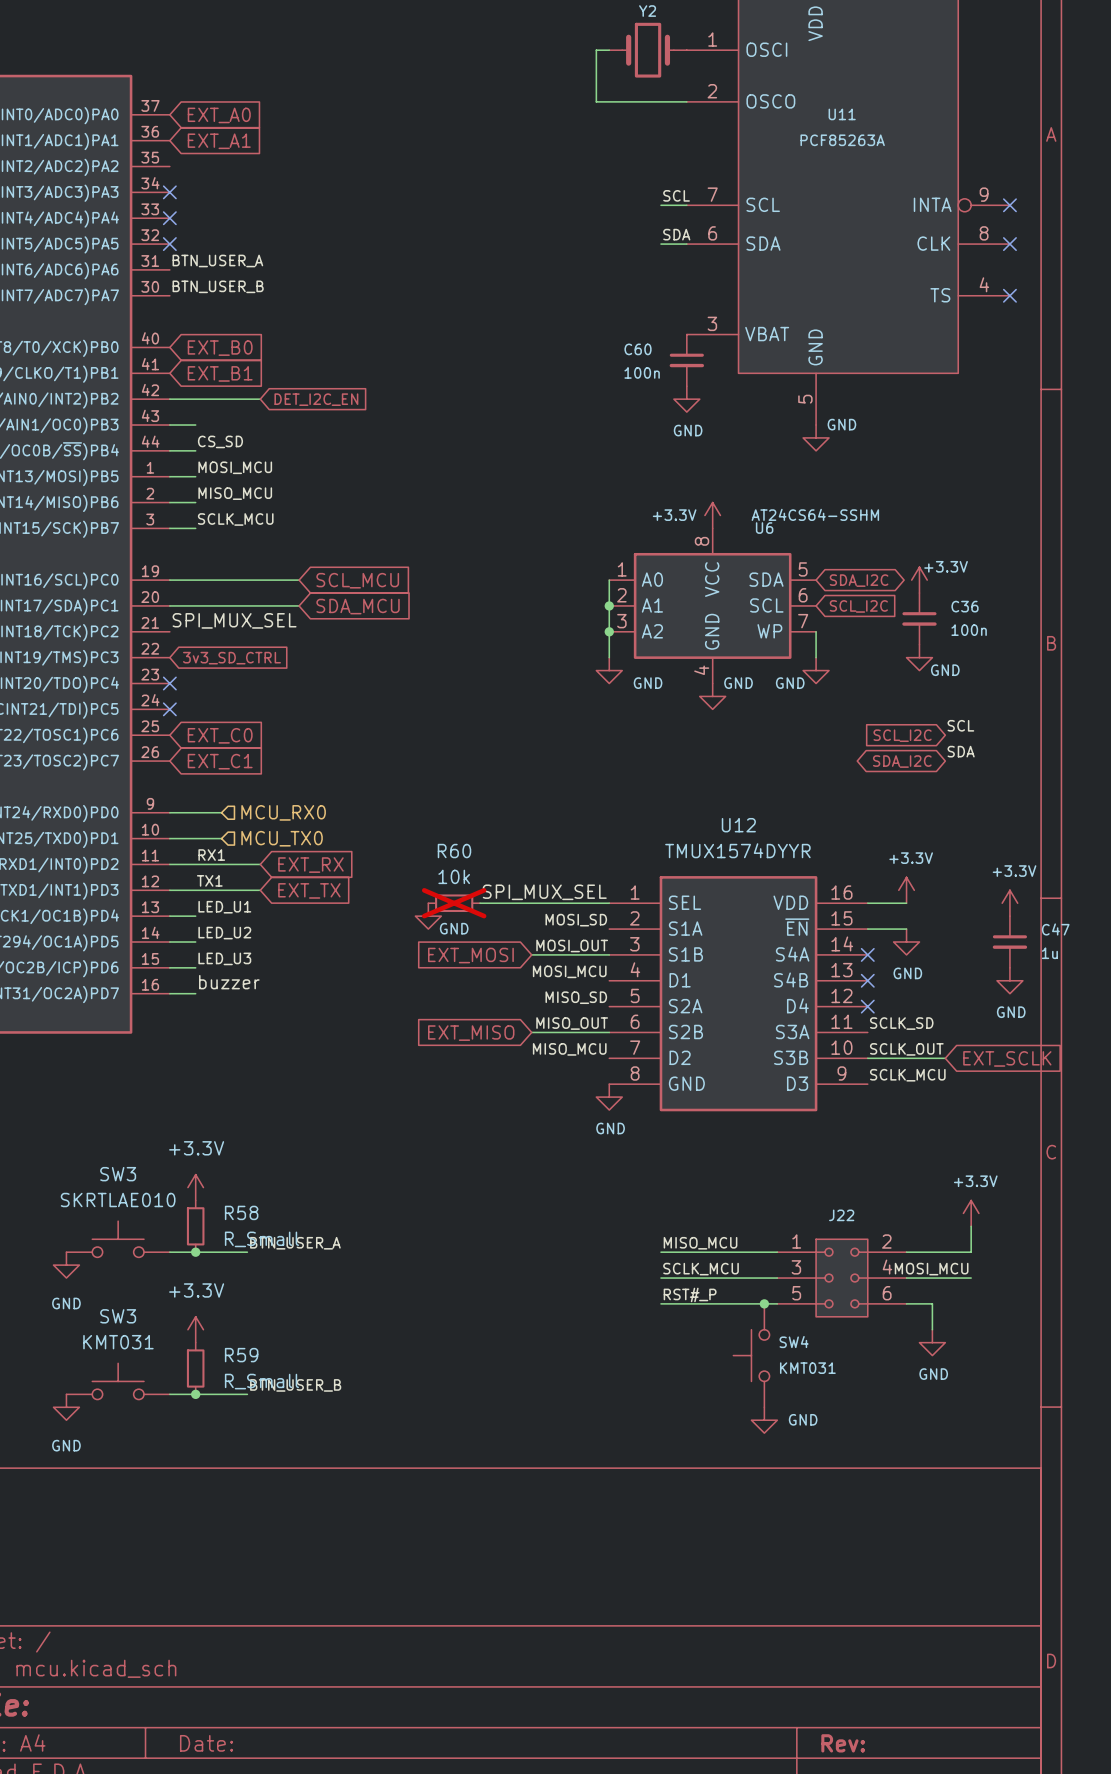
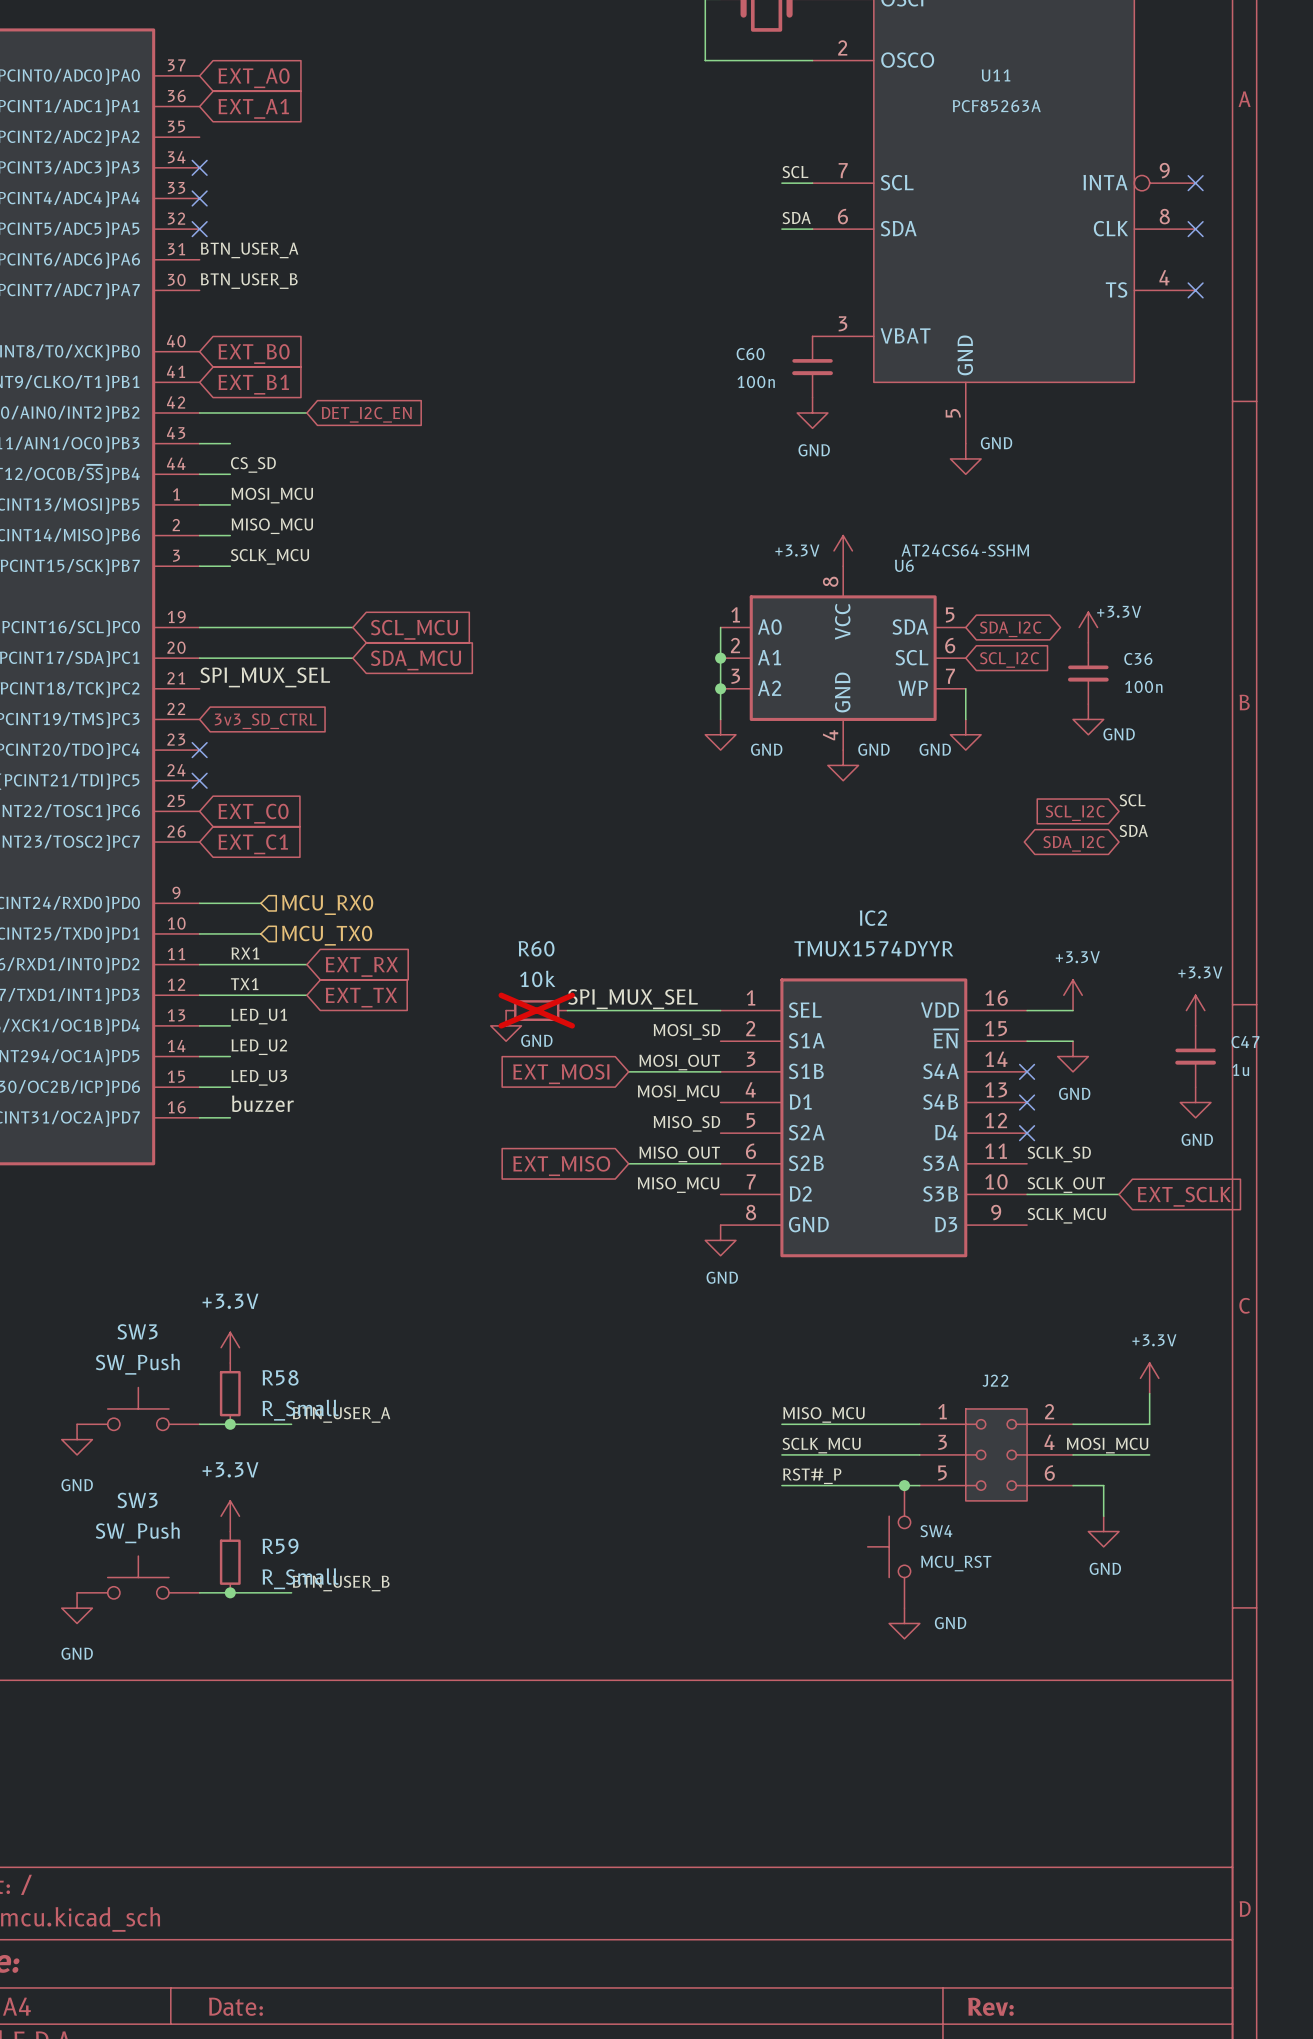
U12 name: U12 (738, 825) -> IC2 (873, 918)
SW3 value: SKRTLAE010 (118, 1200) -> SW_Push (137, 1364)
SW3 value: KMT031 (118, 1342) -> SW_Push (137, 1532)
SW4 value: KMT031 (807, 1368) -> MCU_RST (956, 1563)

